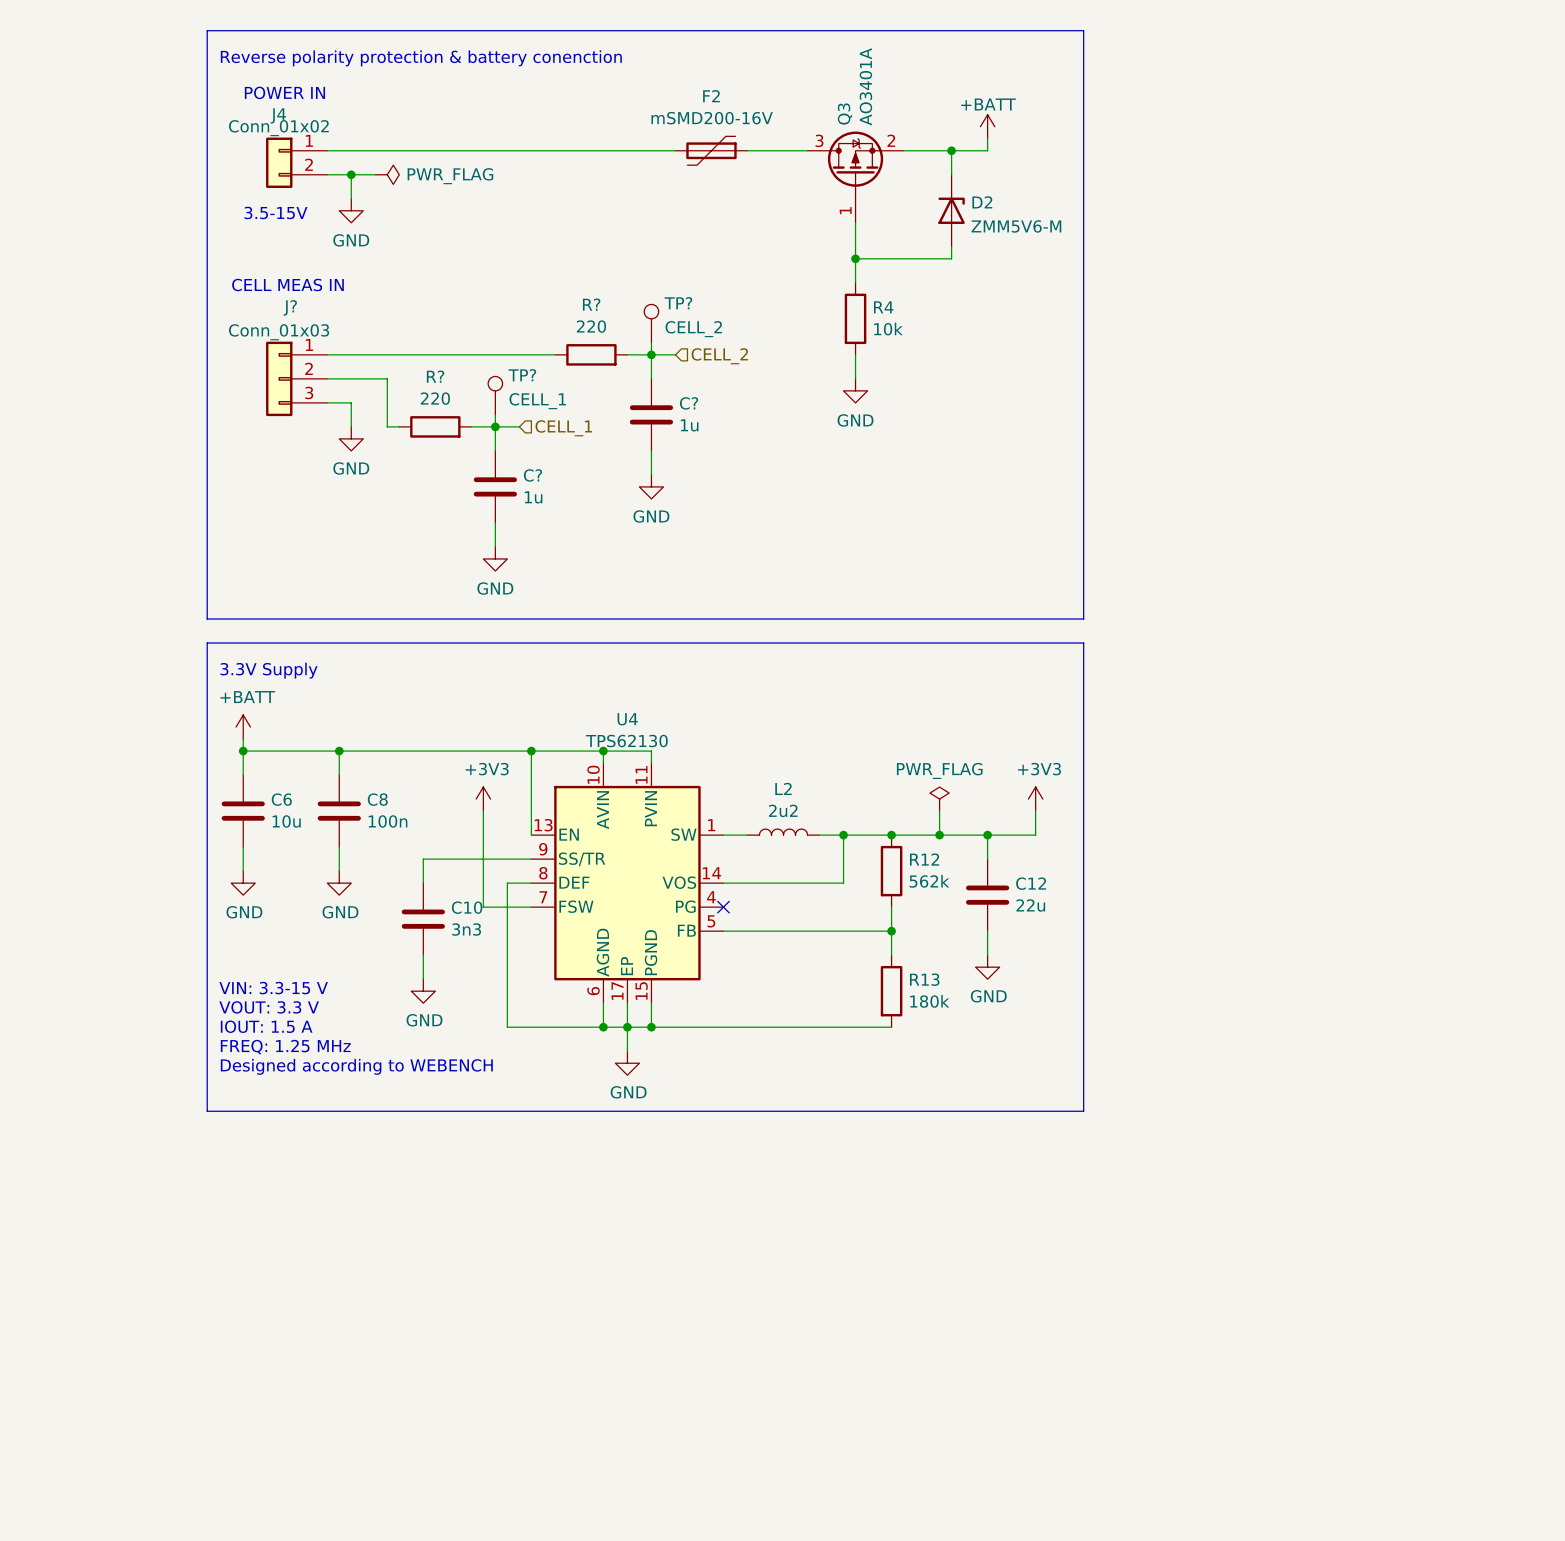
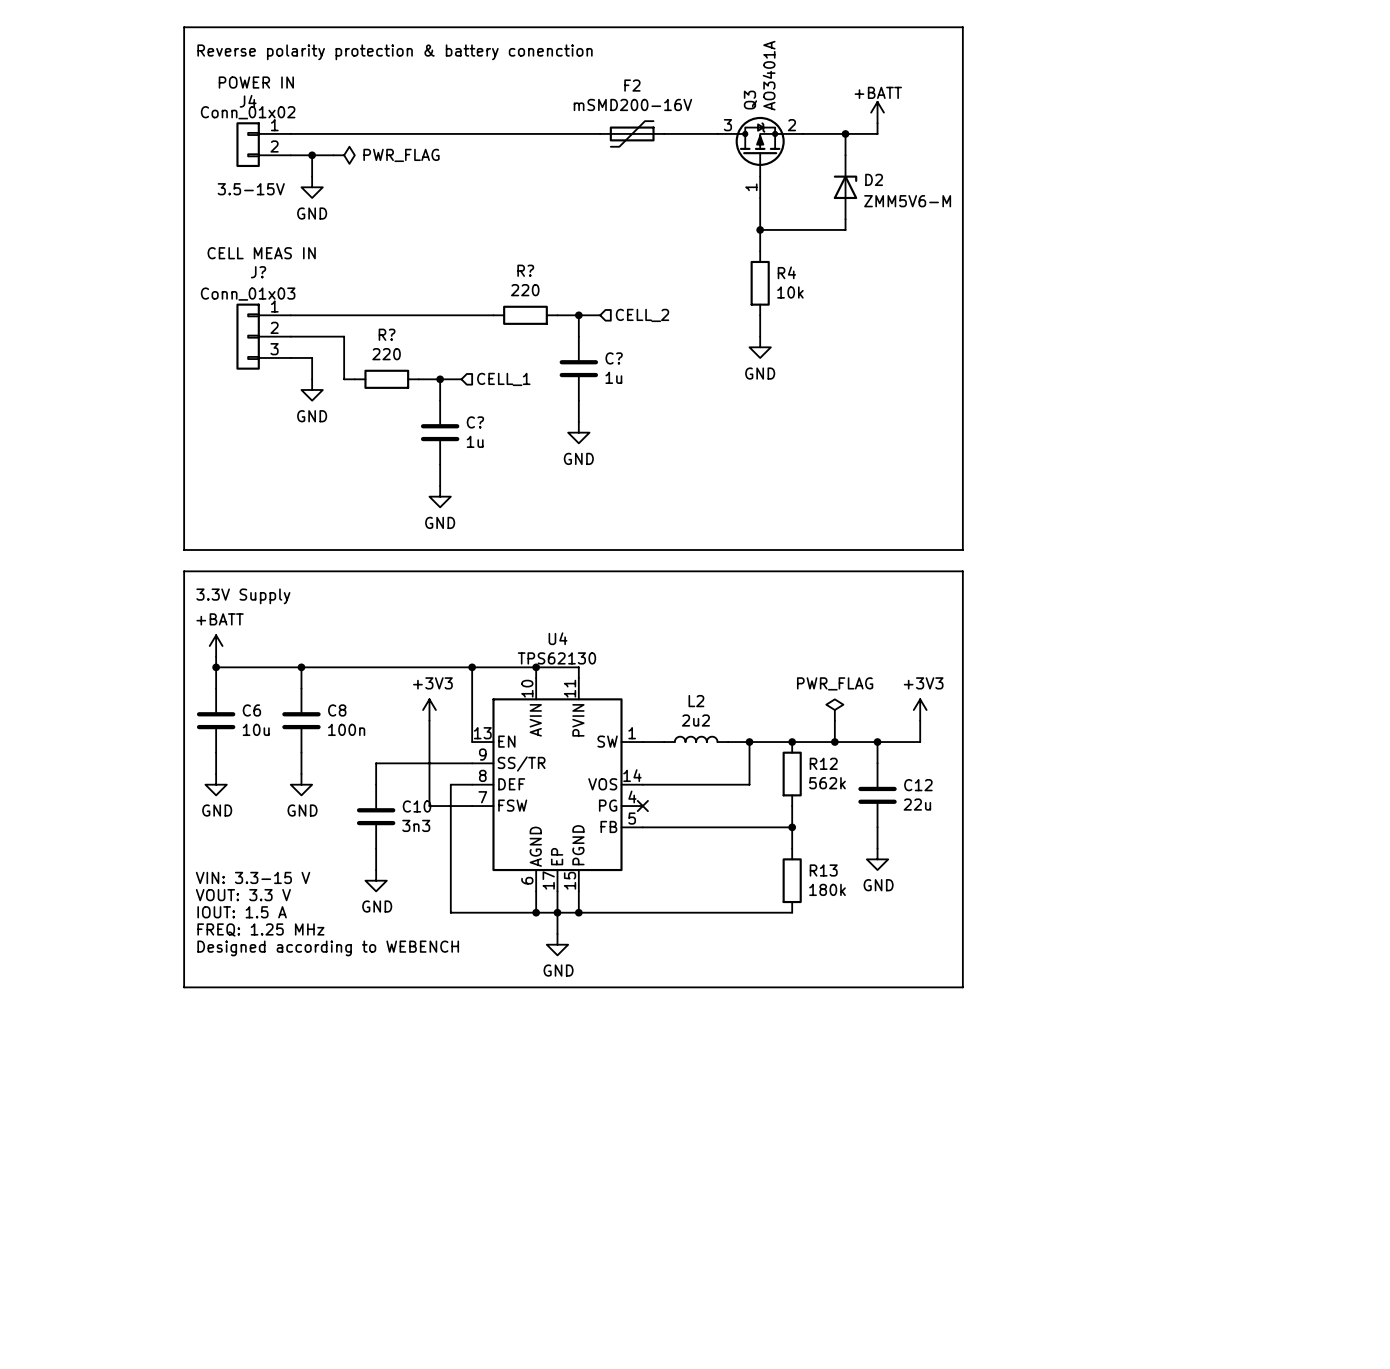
TP?: CELL_2 (651, 323) -> none
wire: (651, 342) (651, 354) -> none
TP?: CELL_1 (495, 395) -> none
wire: (495, 414) (495, 426) -> none

